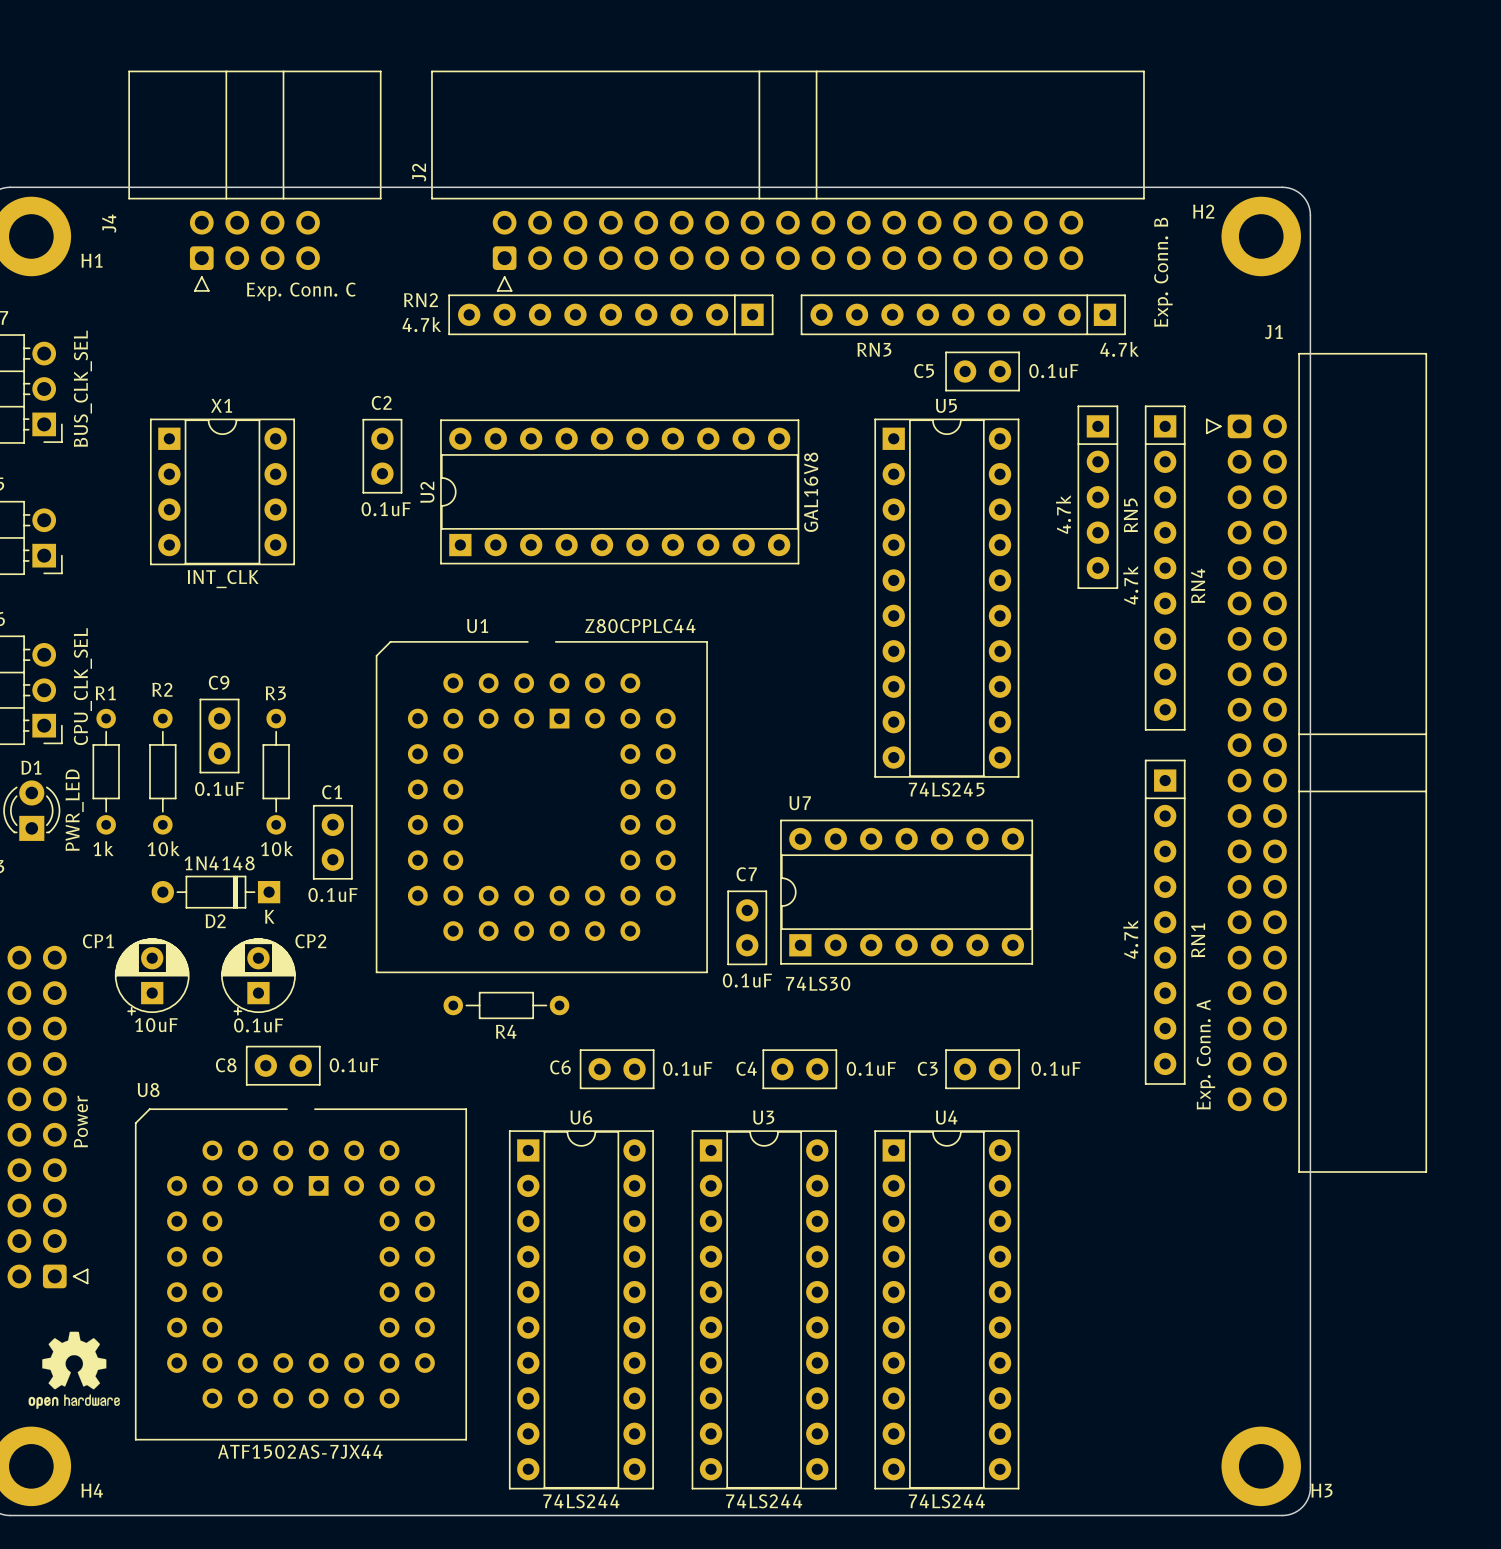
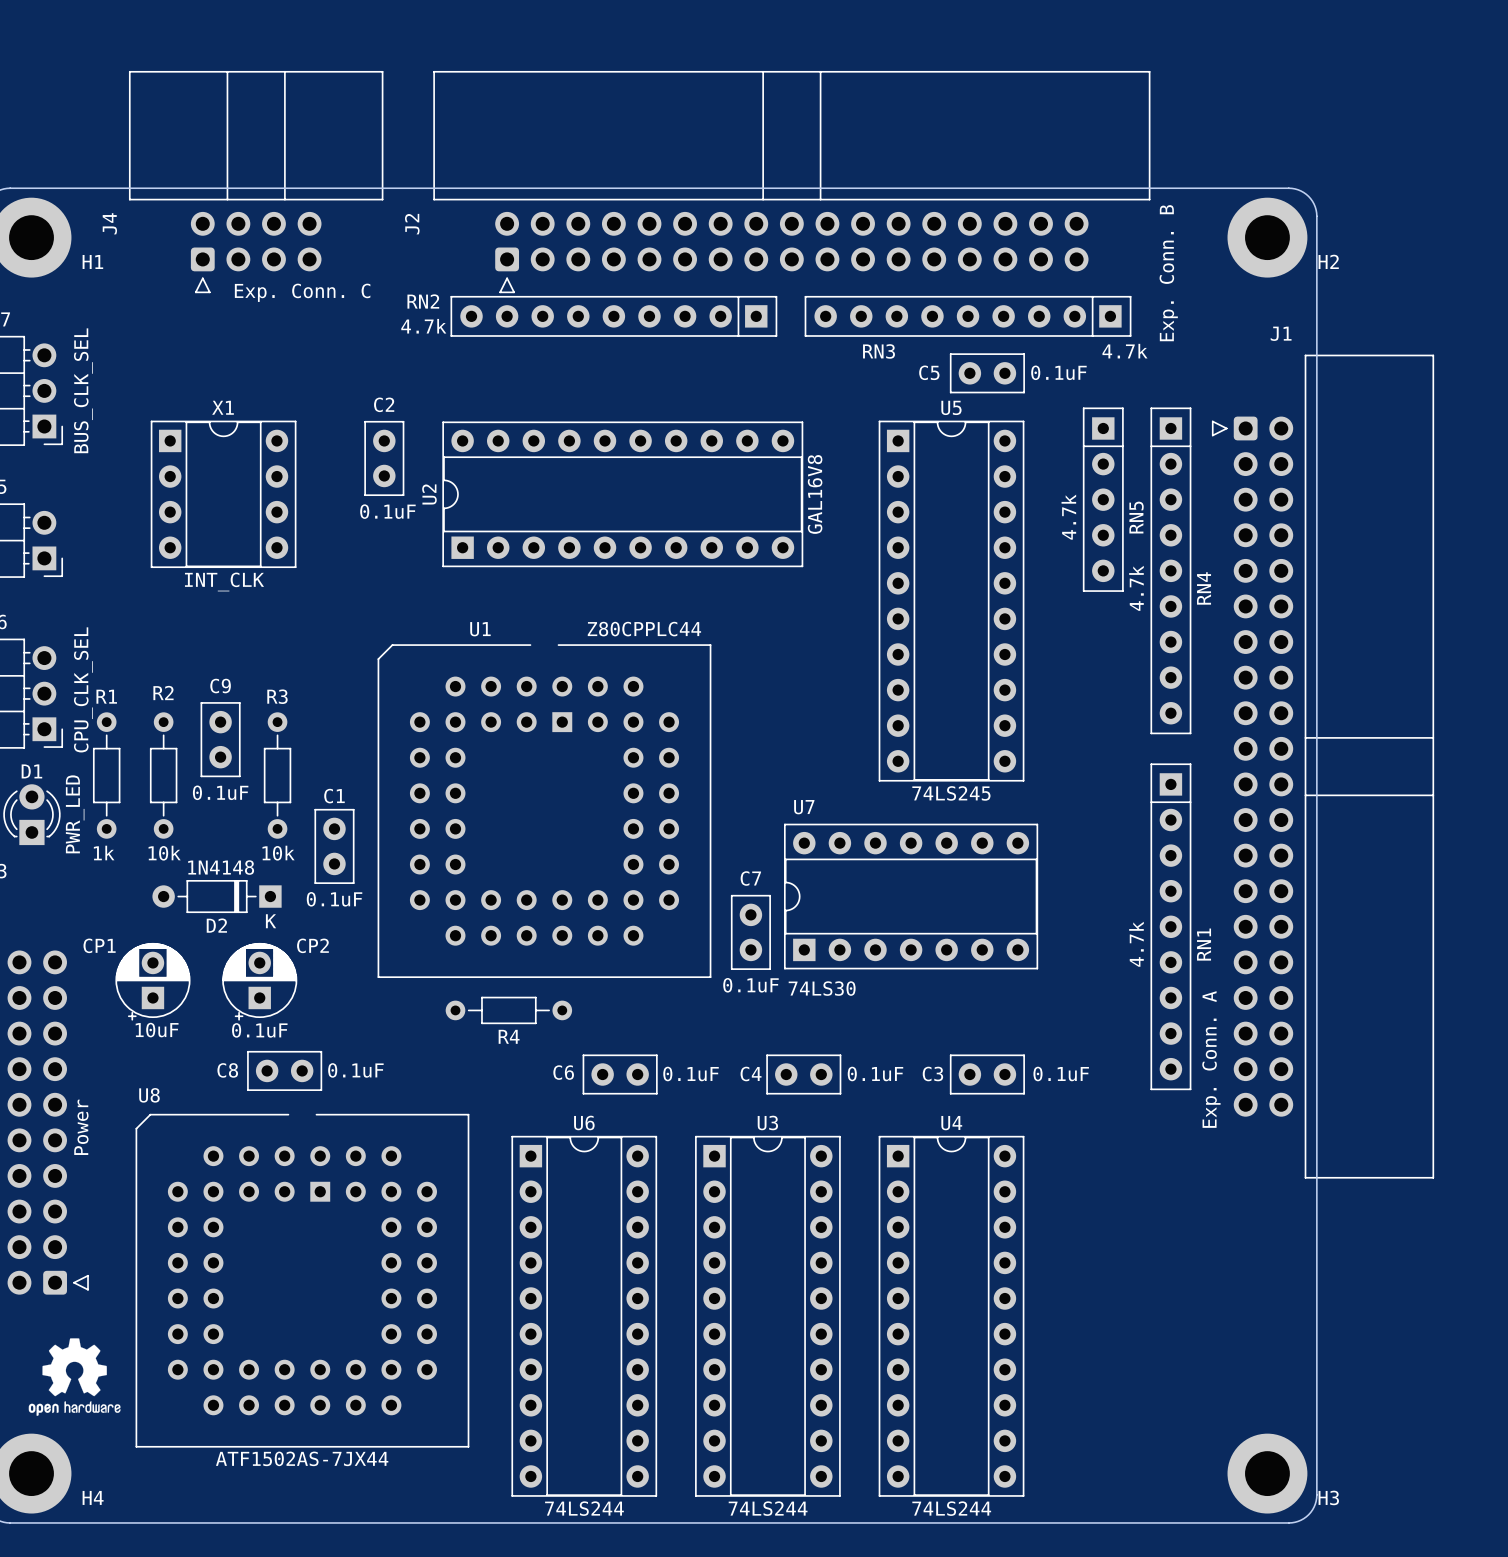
J2 name position: J2 (419, 172) -> J2 (412, 224)
H2 name position: H2 (1203, 211) -> H2 (1328, 261)

